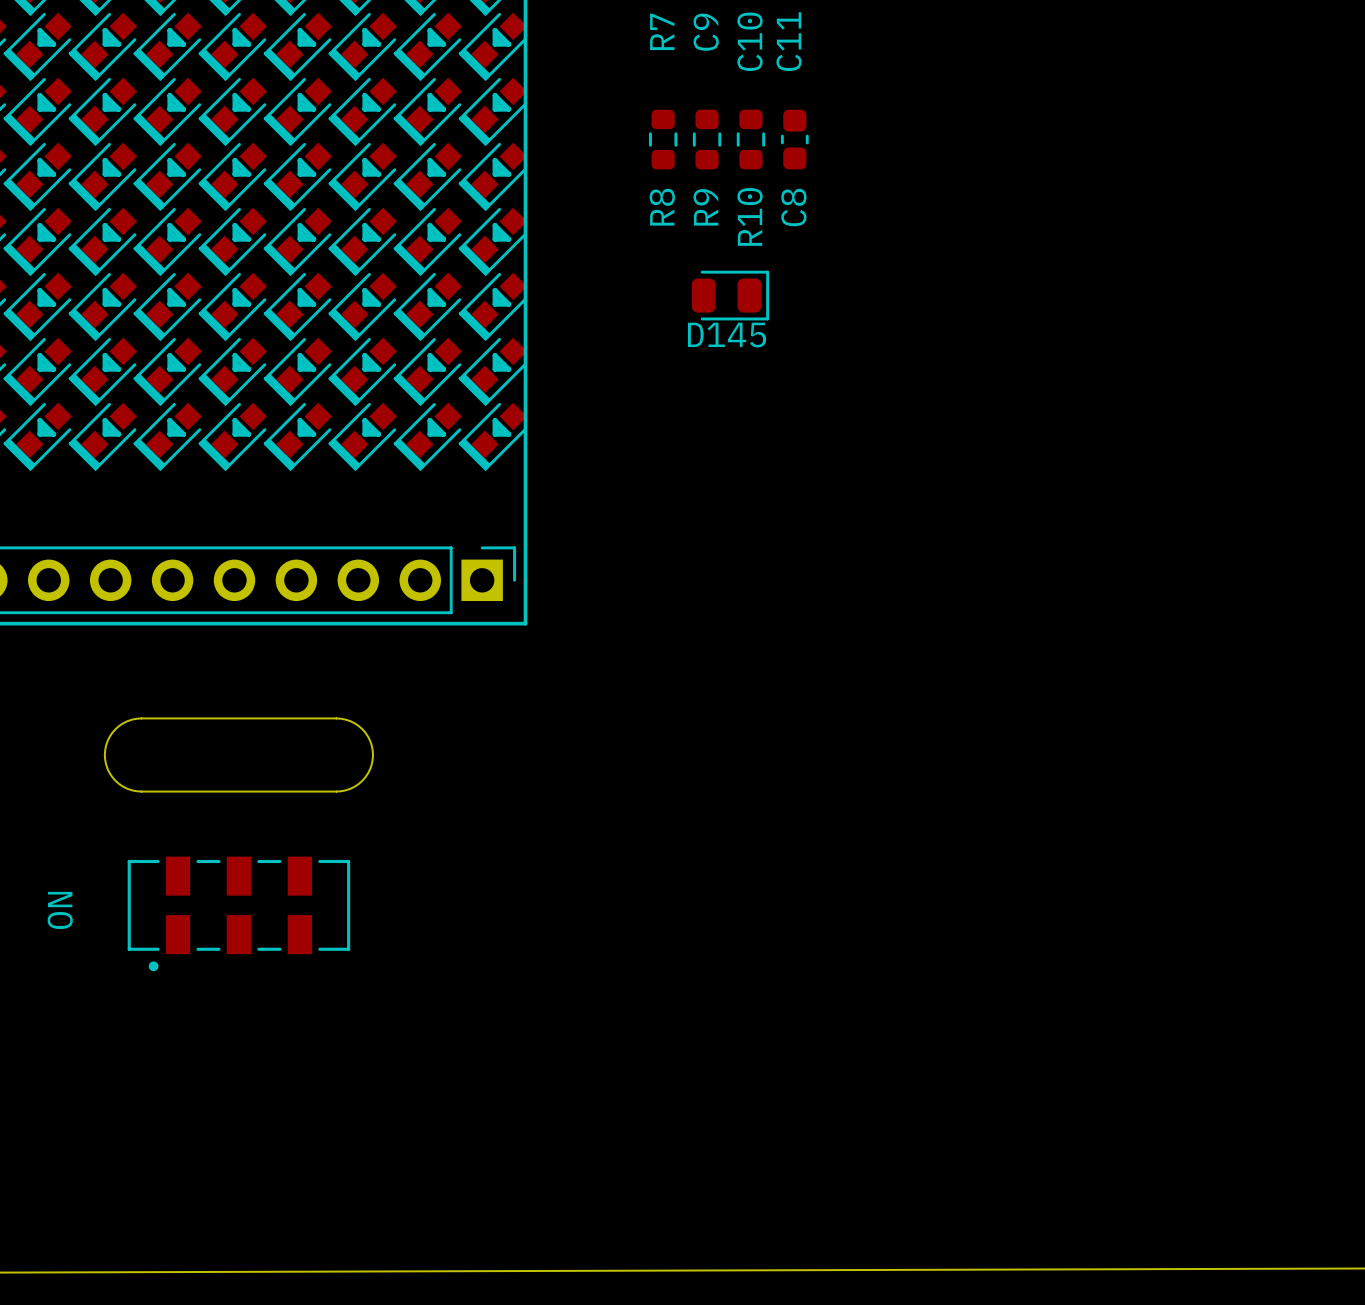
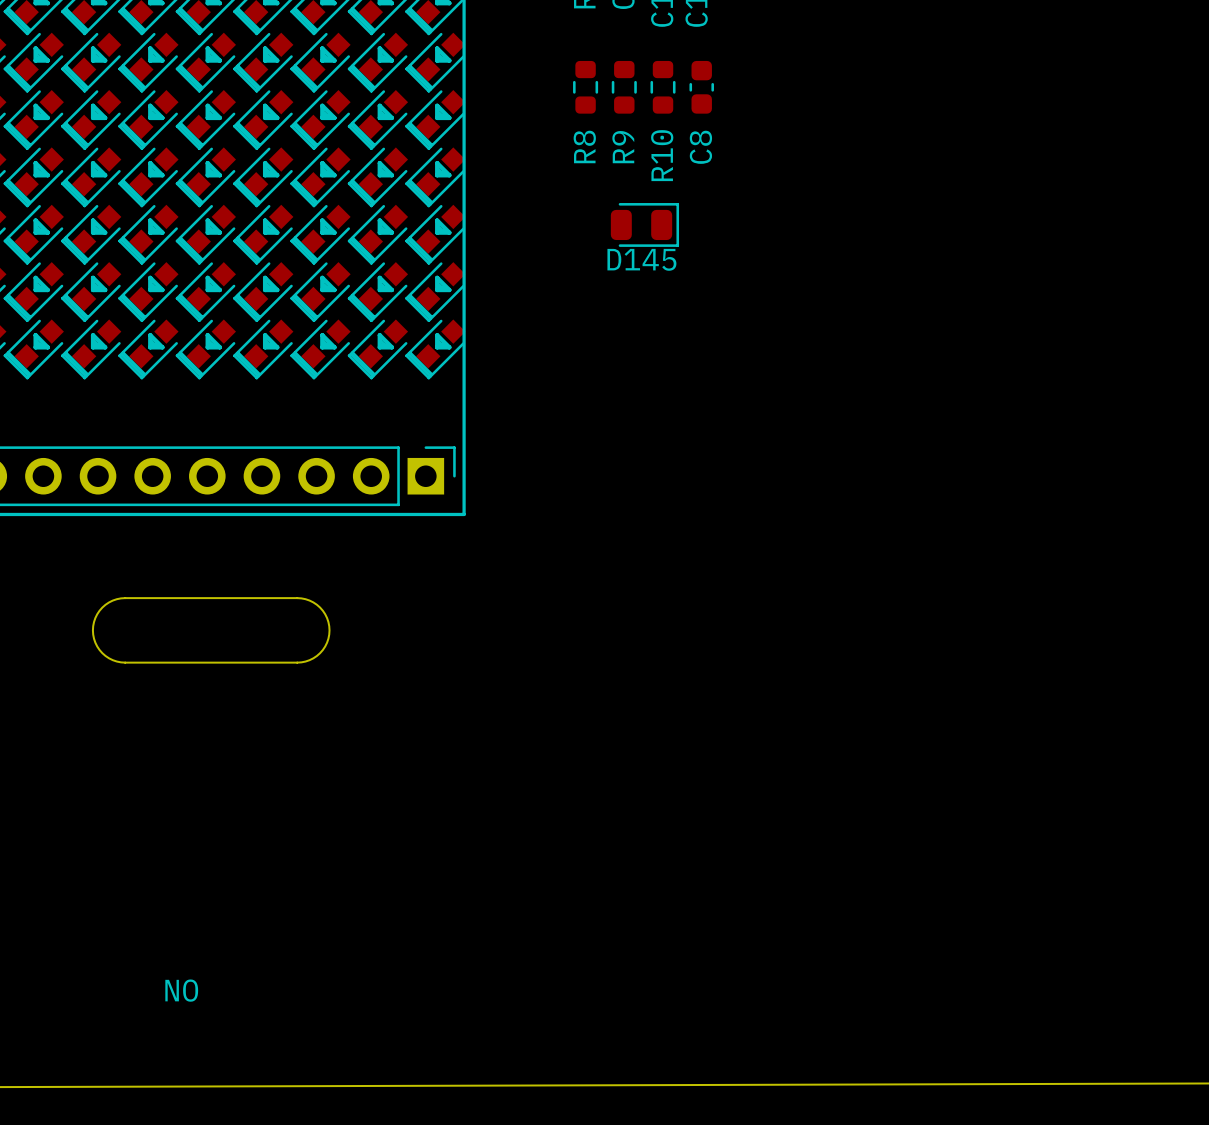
text rotation: 0° (60, 910) -> 90° counterclockwise (181, 990)
text position: ON (60, 910) -> ON (181, 990)
part: (238, 913) -> none

